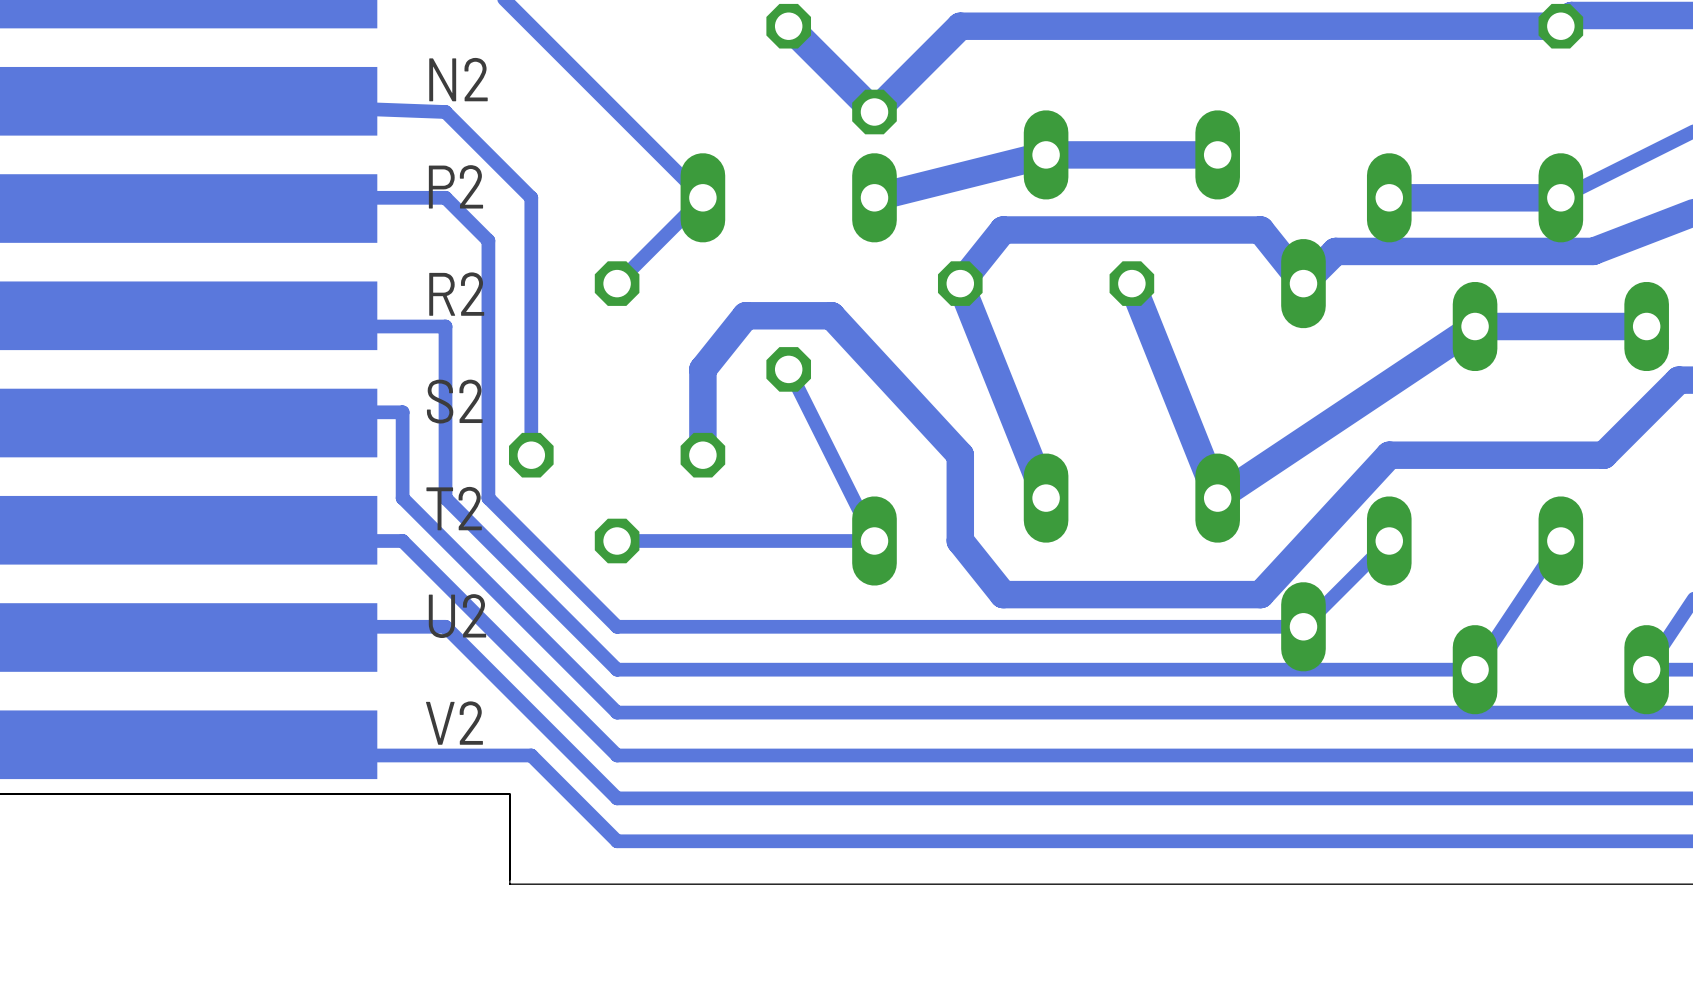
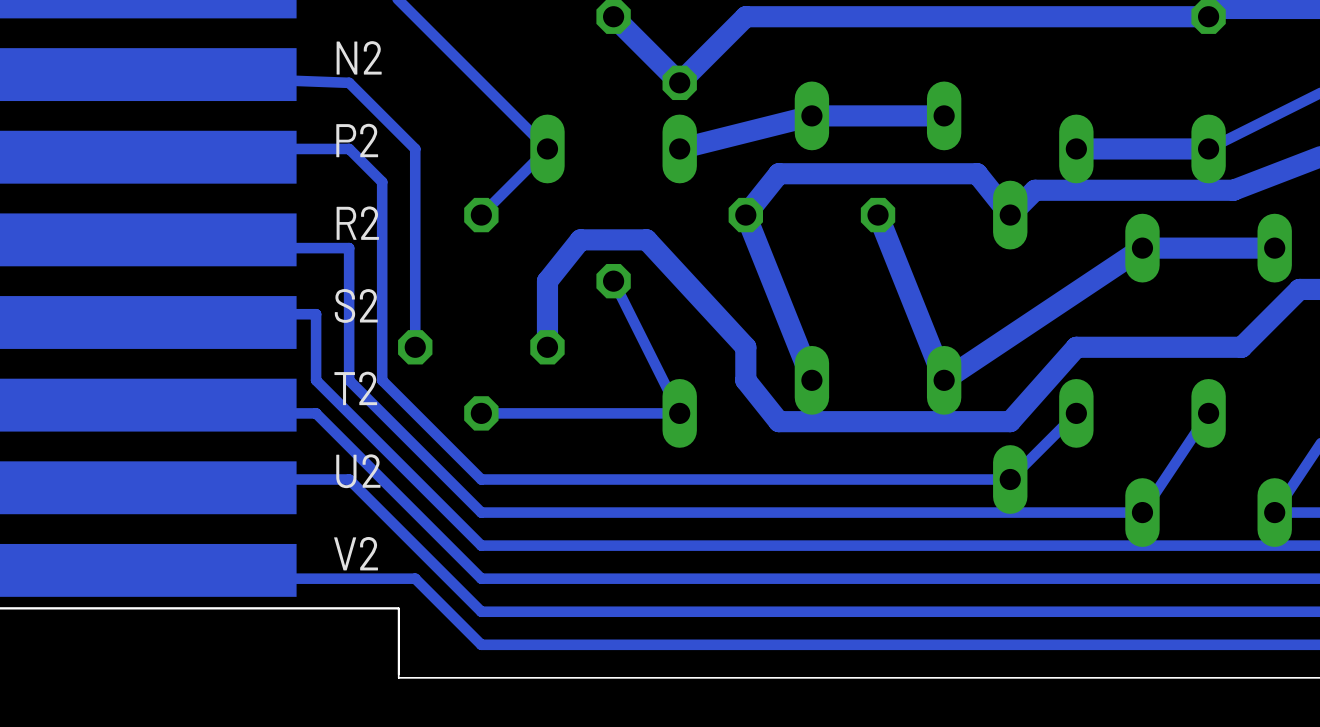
bottom track: (1389, 455) (1260, 594) (1003, 594) (960, 540) (960, 498) -> (1076, 347) (1010, 421) (778, 421) (745, 380)

